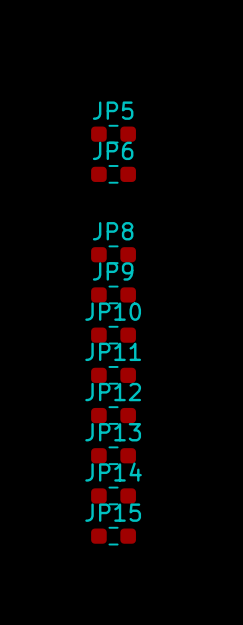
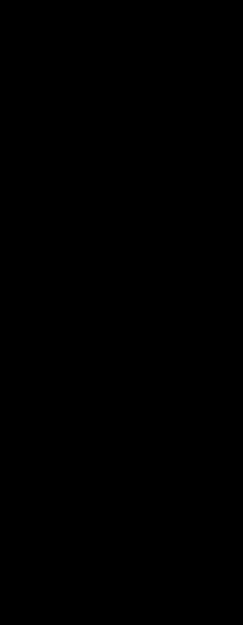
JP5: (113, 134) -> none
JP6: (113, 174) -> none
JP8: (113, 254) -> none
JP9: (113, 294) -> none
JP10: (113, 335) -> none
JP11: (113, 375) -> none
JP12: (113, 415) -> none
JP13: (113, 455) -> none
JP14: (113, 495) -> none
JP15: (113, 536) -> none

